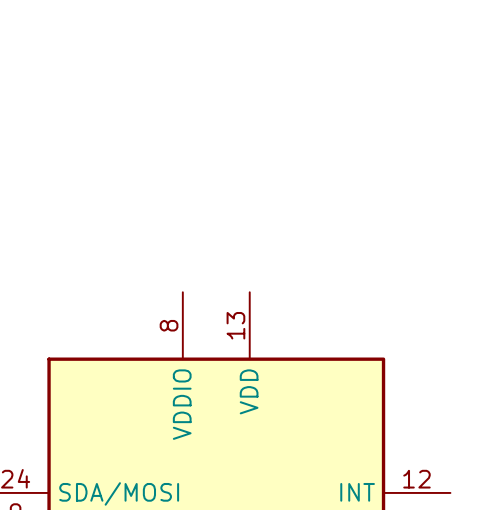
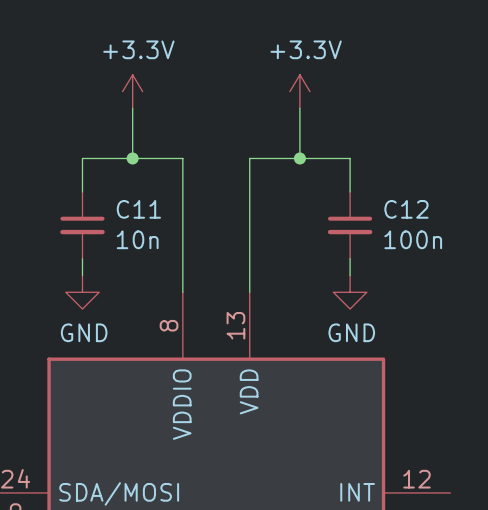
power symbol: none -> +3.3V (132, 91)
power symbol: none -> +3.3V (299, 91)
wire: none -> (132, 108) (132, 158)
wire: none -> (299, 108) (299, 158)
junction: none -> (132, 158)
junction: none -> (299, 158)
wire: none -> (82, 191) (82, 158) (182, 158) (182, 292)
wire: none -> (350, 191) (350, 158) (249, 158) (249, 292)
C11: none -> 10n (82, 225)
C12: none -> 100n (350, 225)
wire: none -> (82, 258) (82, 275)
wire: none -> (350, 258) (350, 275)
power symbol: none -> GND (82, 292)
power symbol: none -> GND (350, 292)

